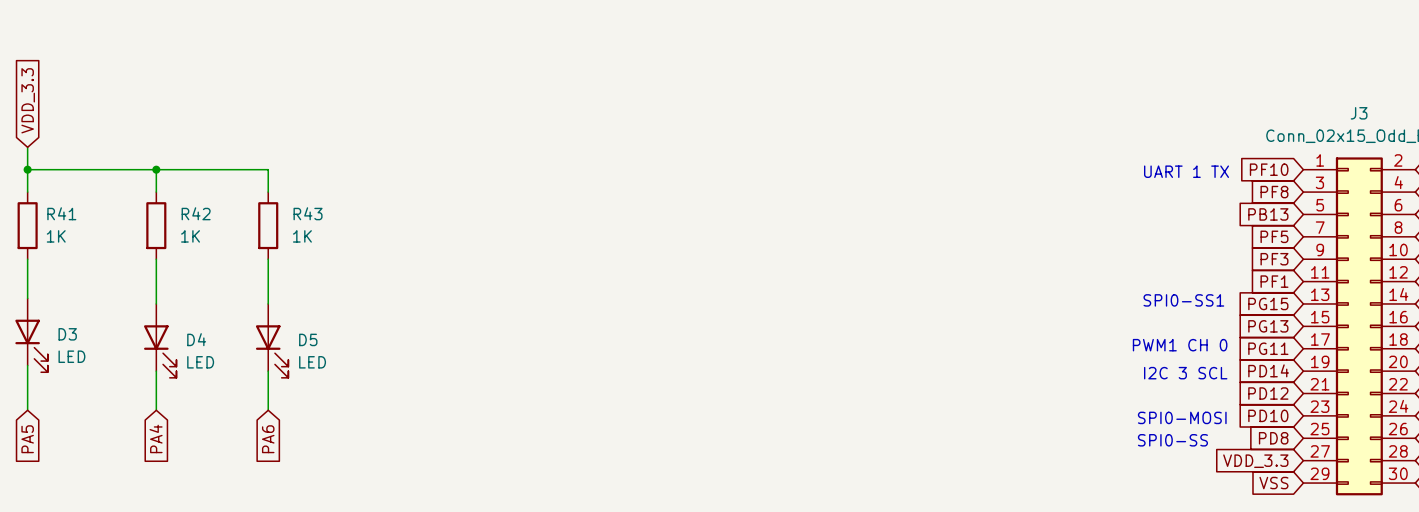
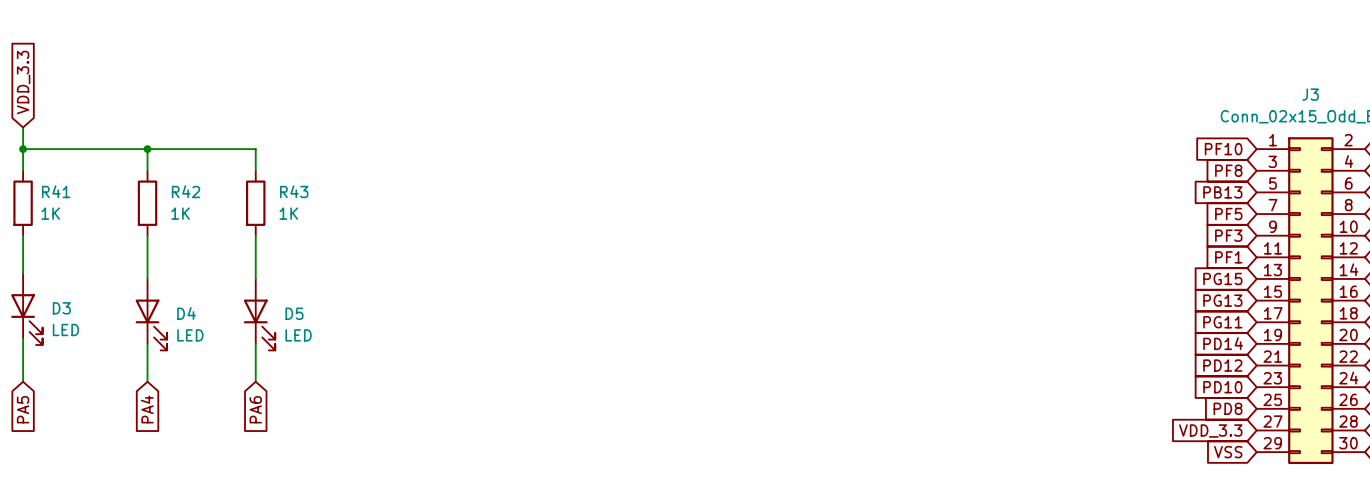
text: UART 1 TX (1186, 171) -> none
text: SPI0-SS1 (1183, 300) -> none
text: PWM1 CH 0 (1180, 345) -> none
text: I2C 3 SCL (1185, 373) -> none
text: SPI0-MOSI (1182, 417) -> none
text: SPI0-SS (1172, 440) -> none

